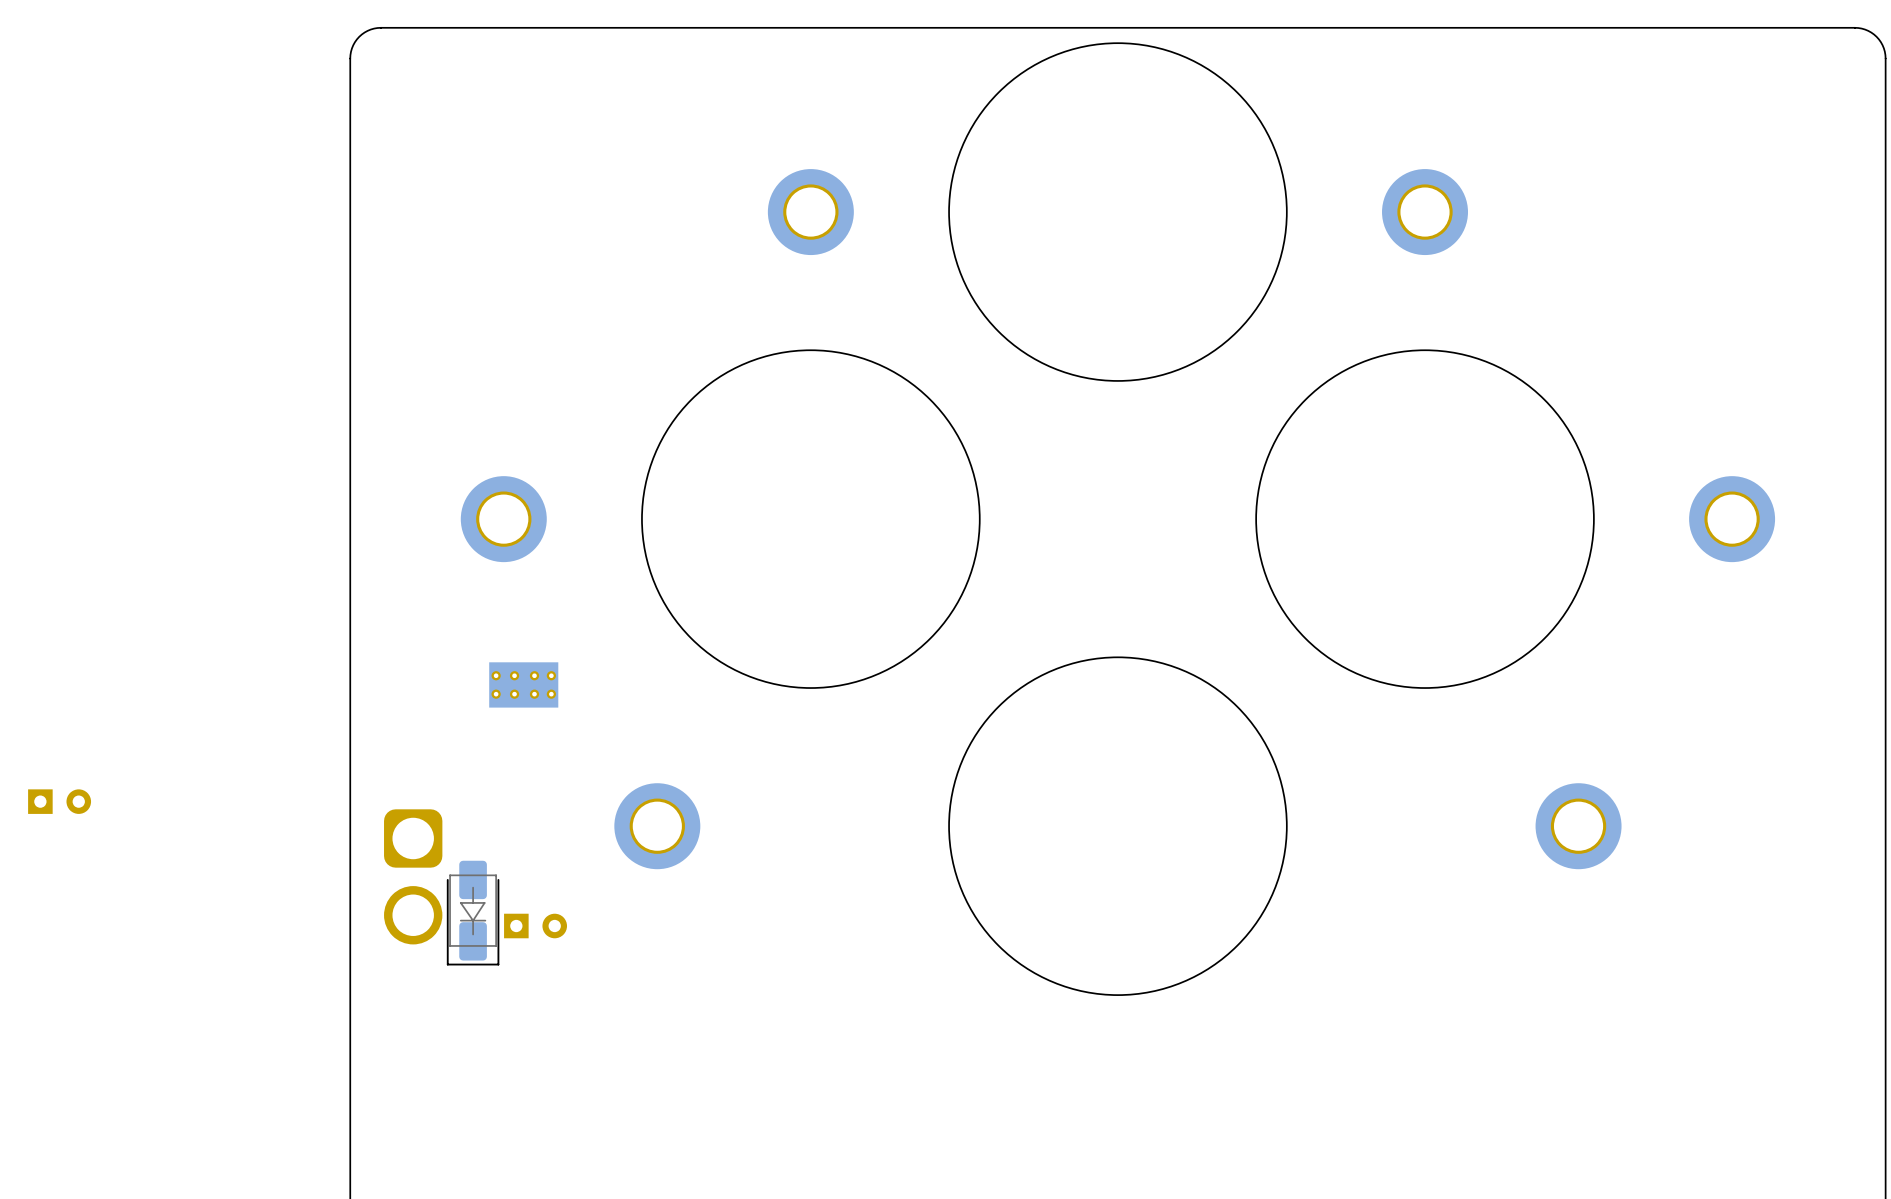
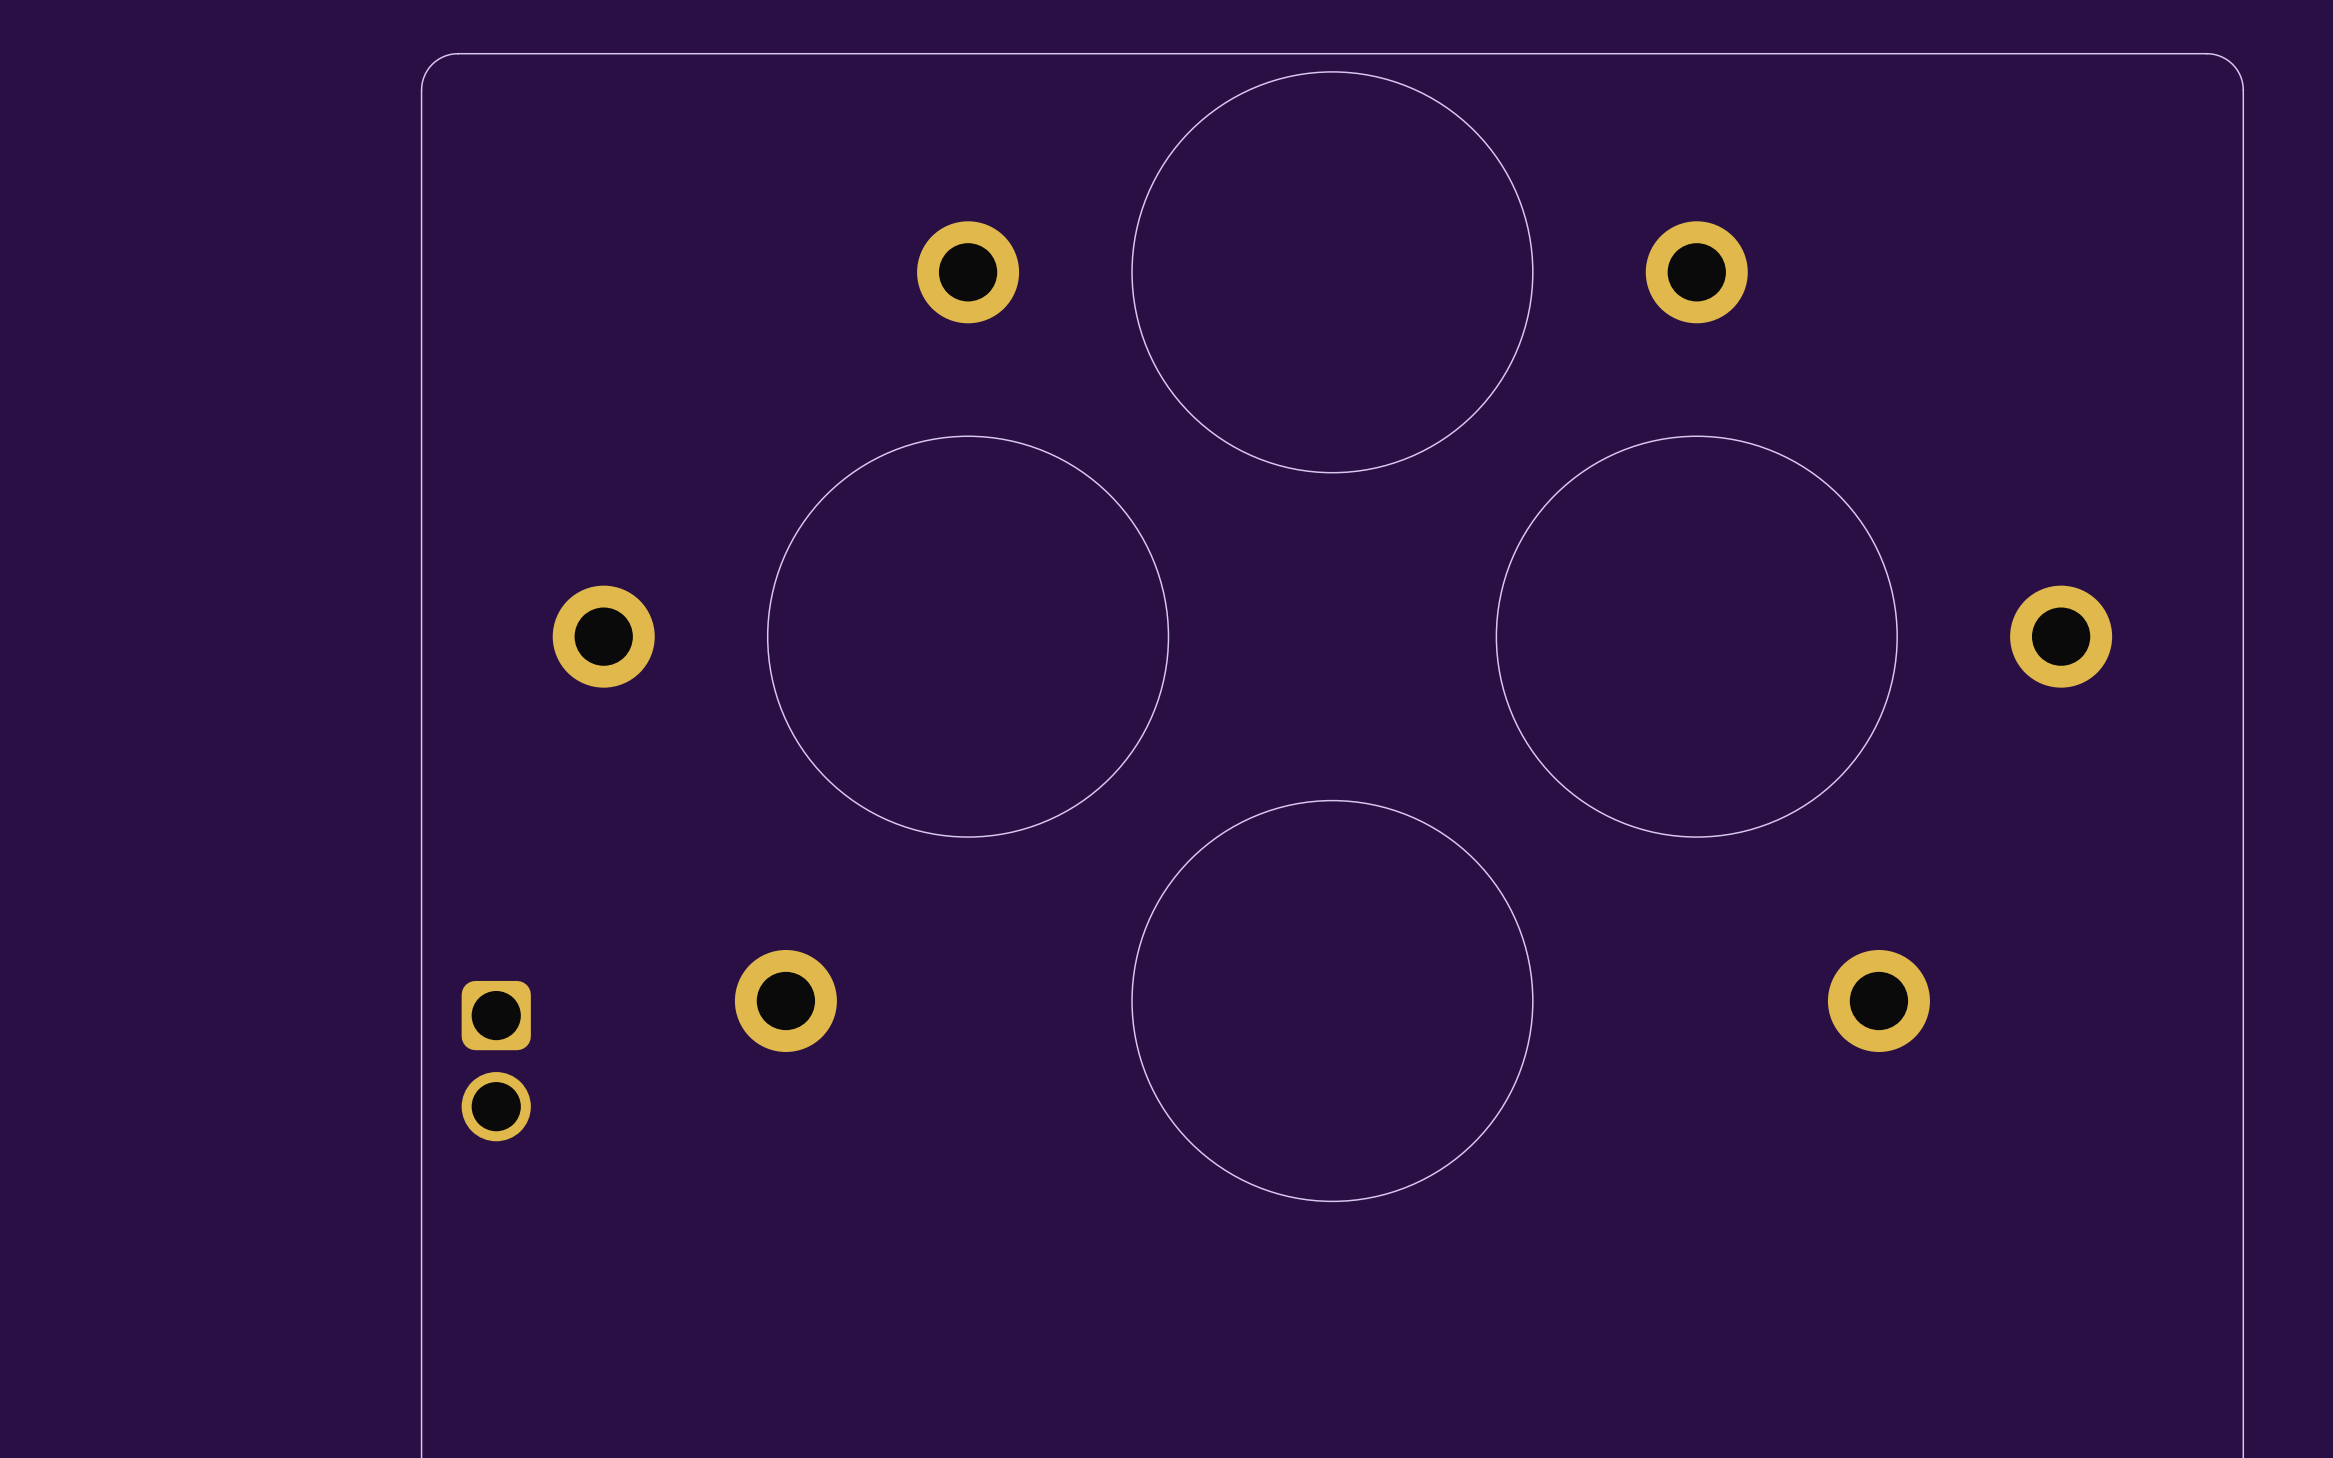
part: (523, 684) -> none
part: (59, 801) -> none
part: (473, 913) -> none
part: (535, 926) -> none

